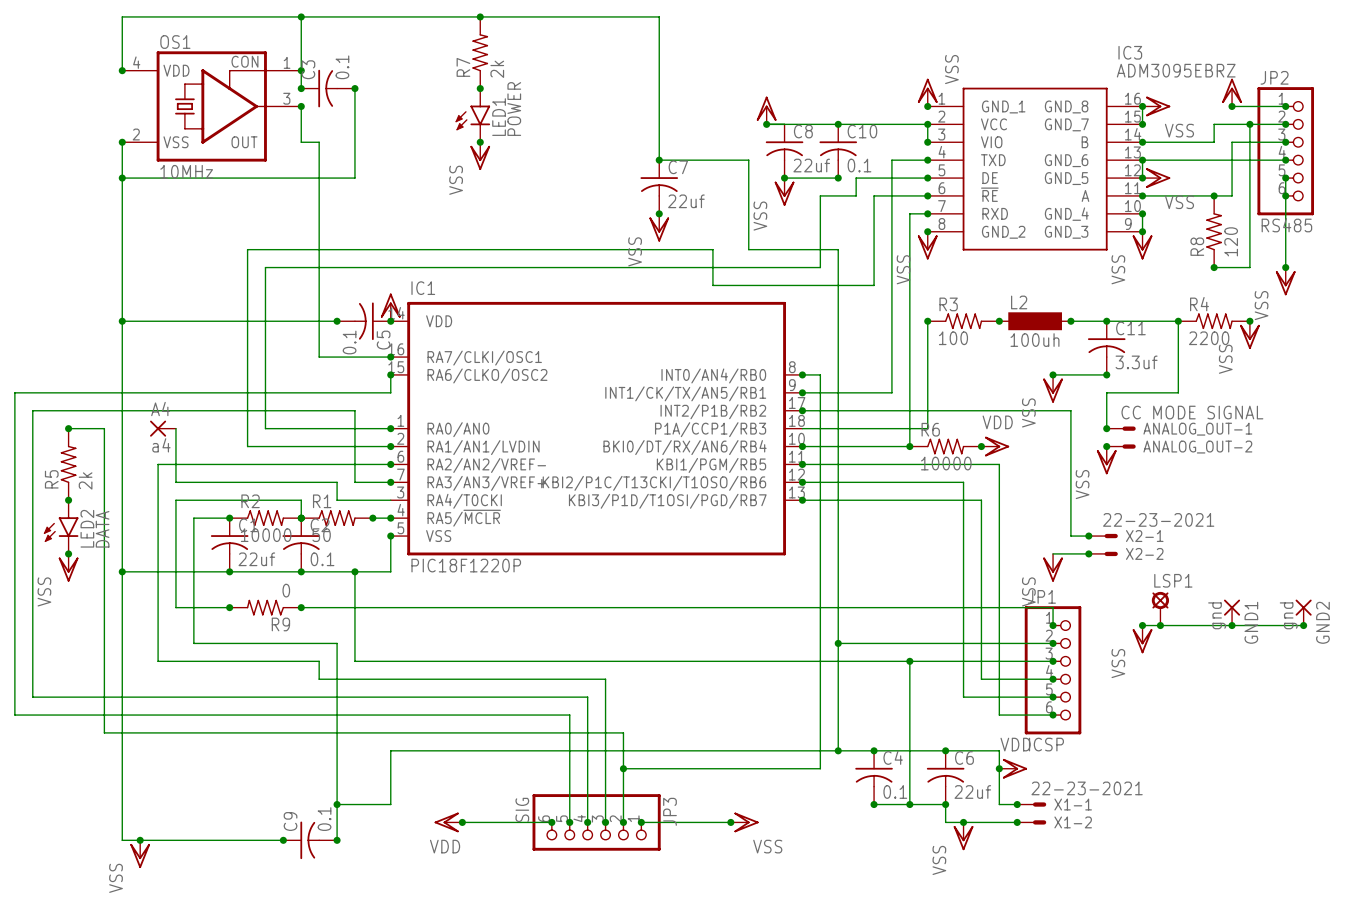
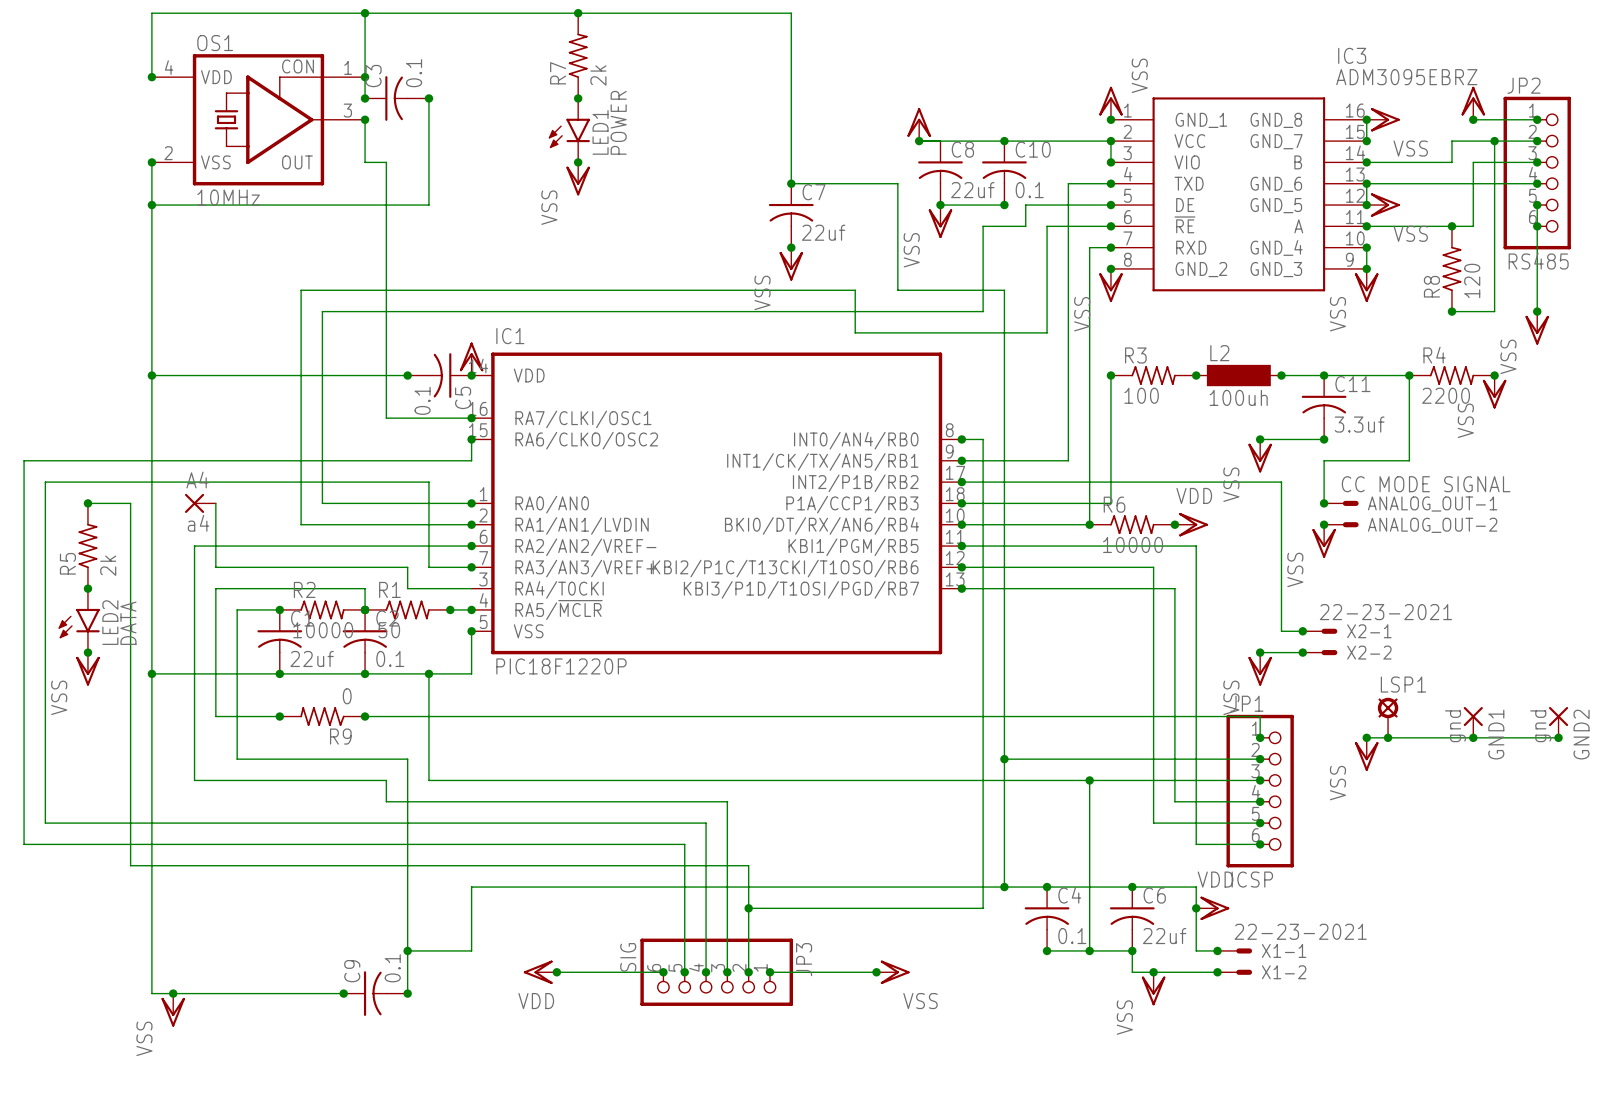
junction: none -> (961, 503)
junction: none -> (1260, 652)

